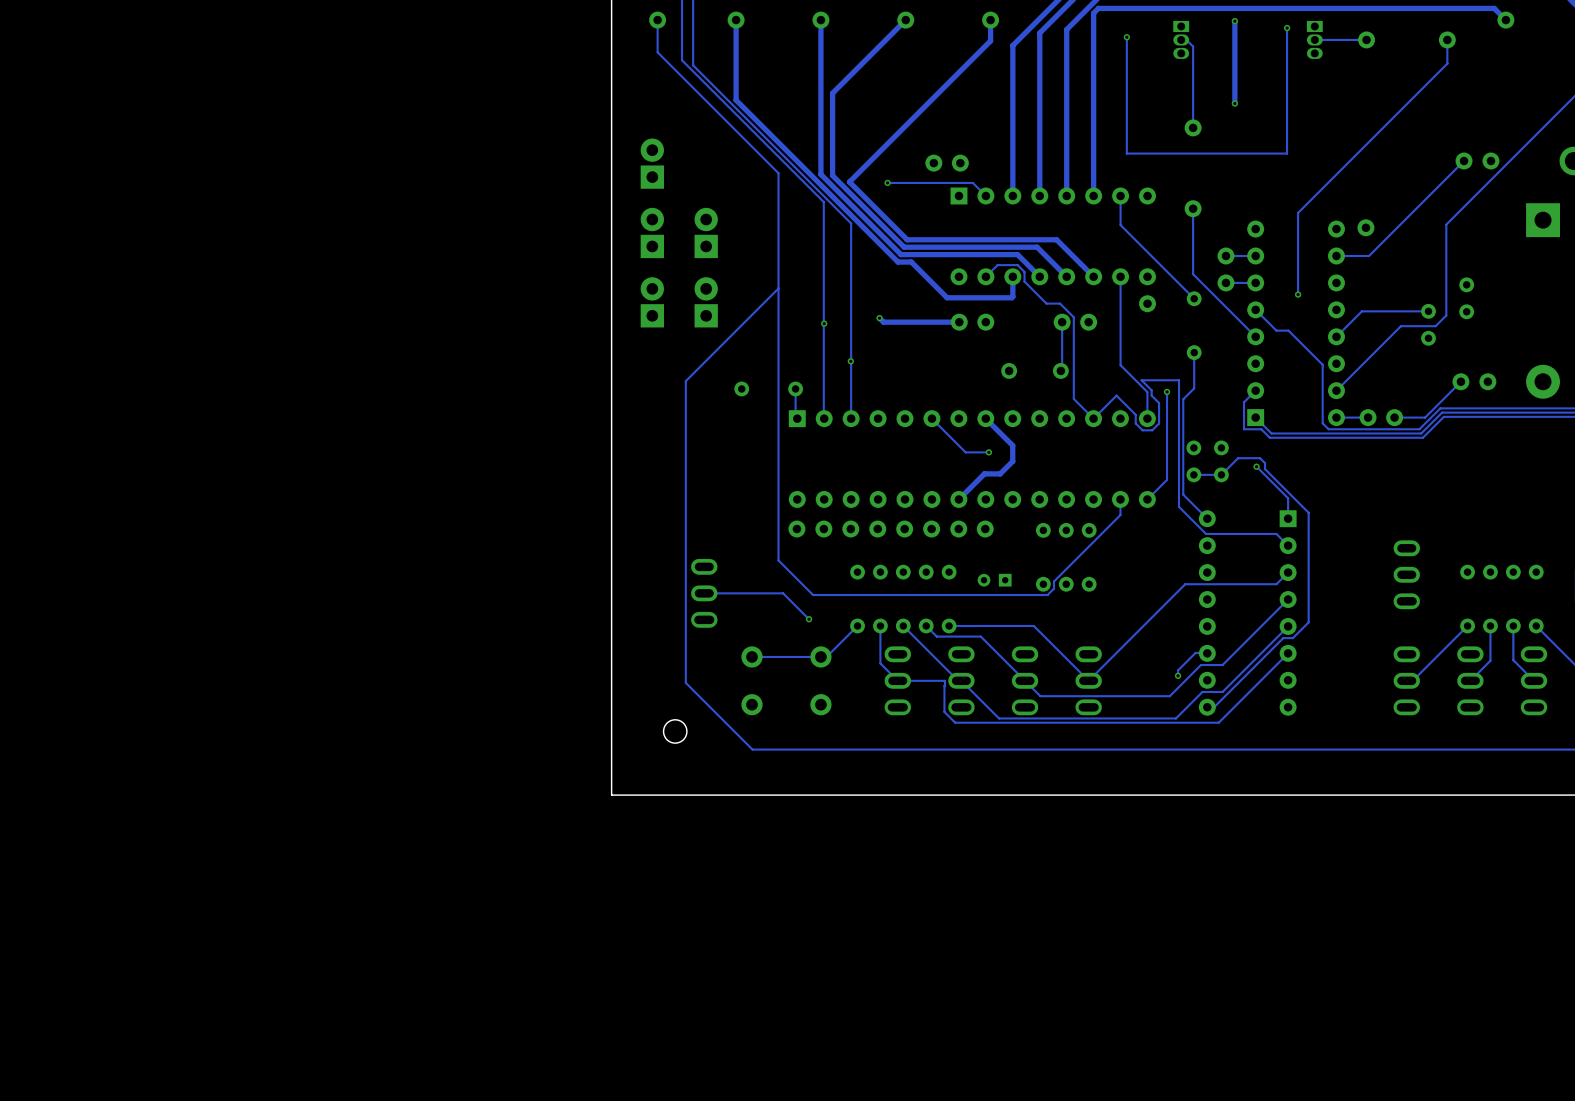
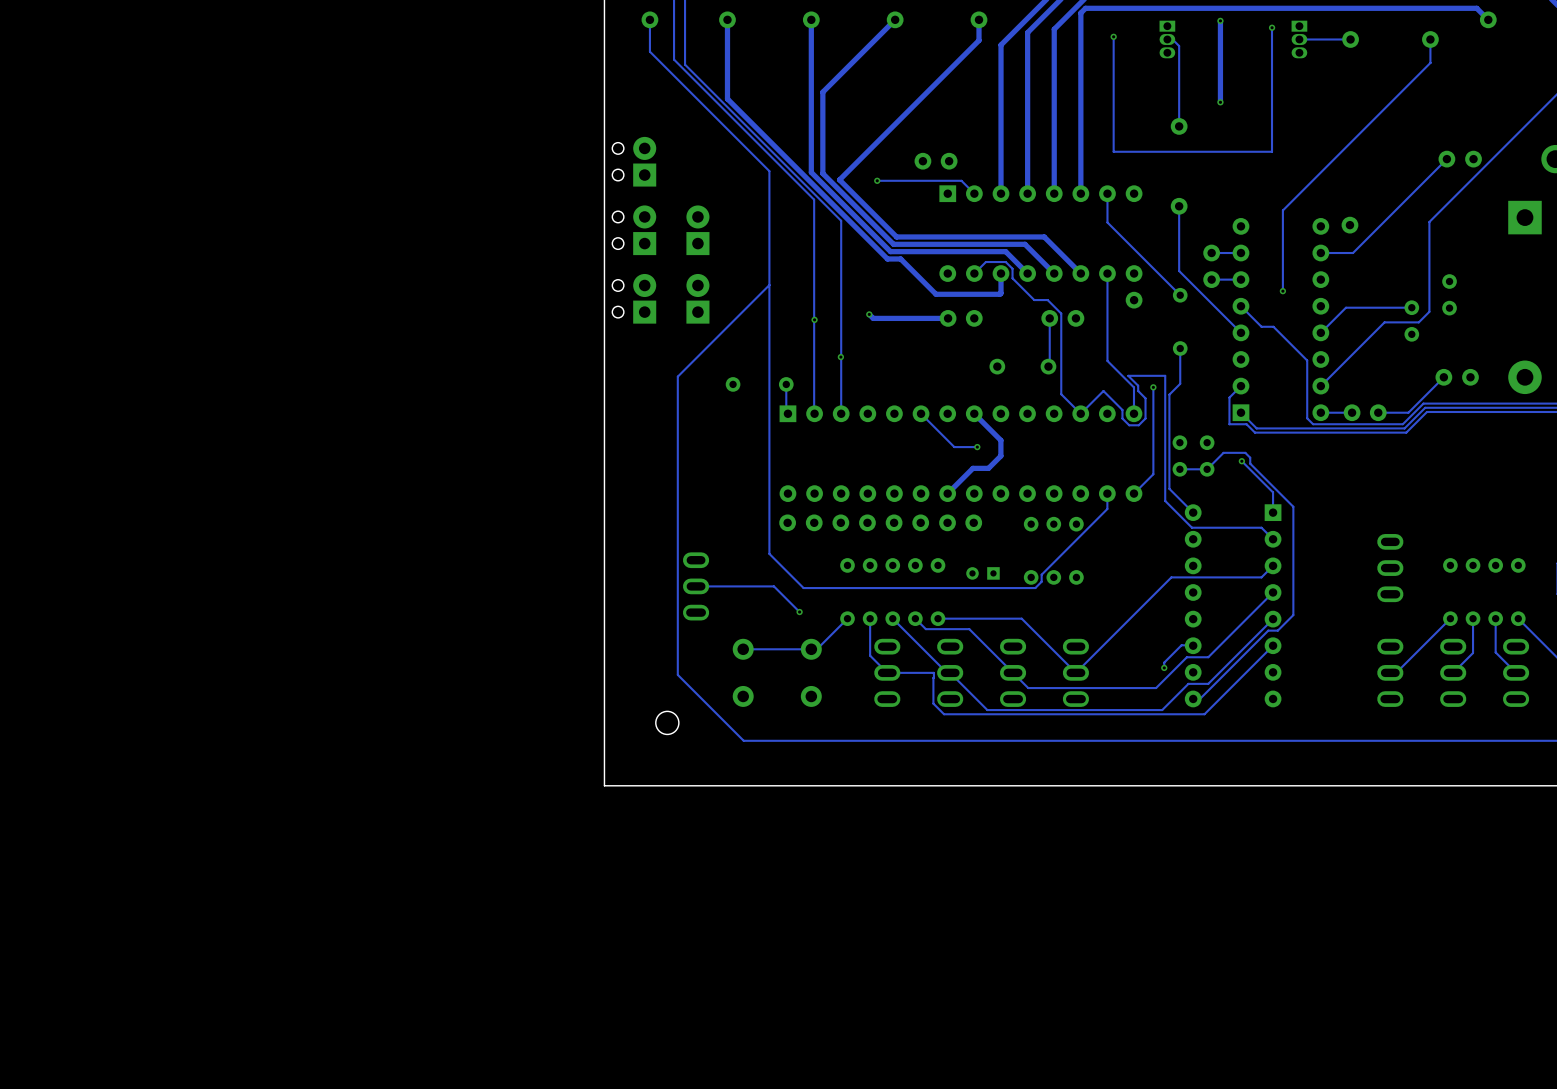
part footprint: [640, 138, 664, 189] -> [612, 136, 657, 187]
part footprint: [640, 207, 664, 259] -> [612, 205, 657, 256]
part footprint: [640, 277, 664, 328] -> [612, 273, 657, 324]

